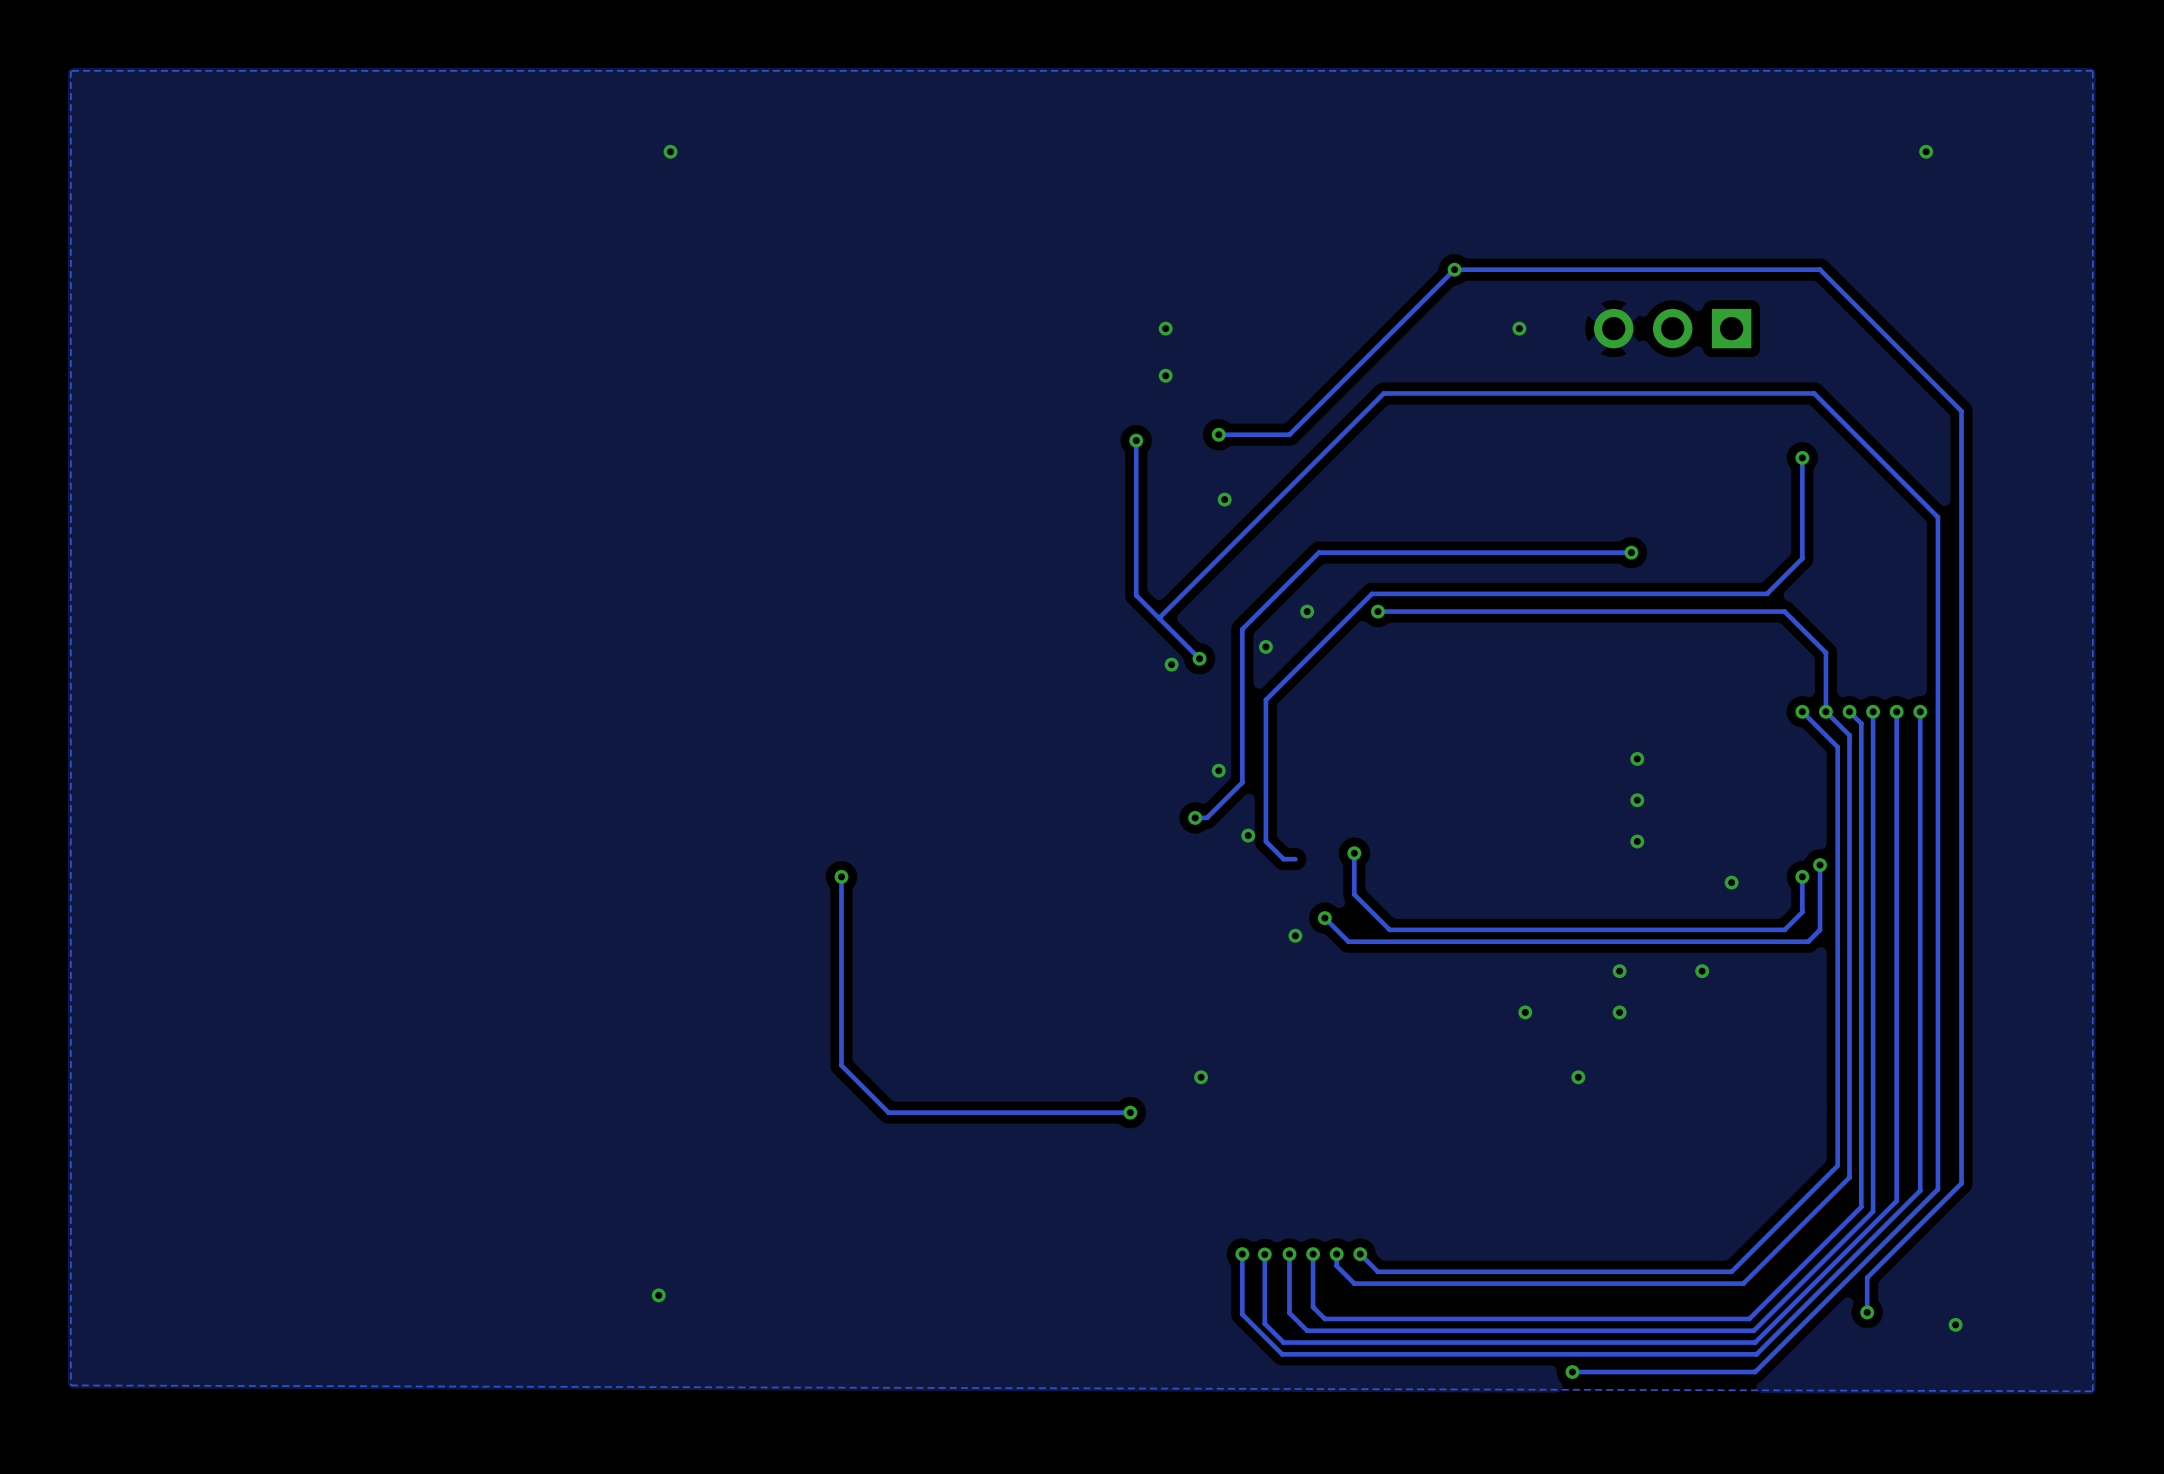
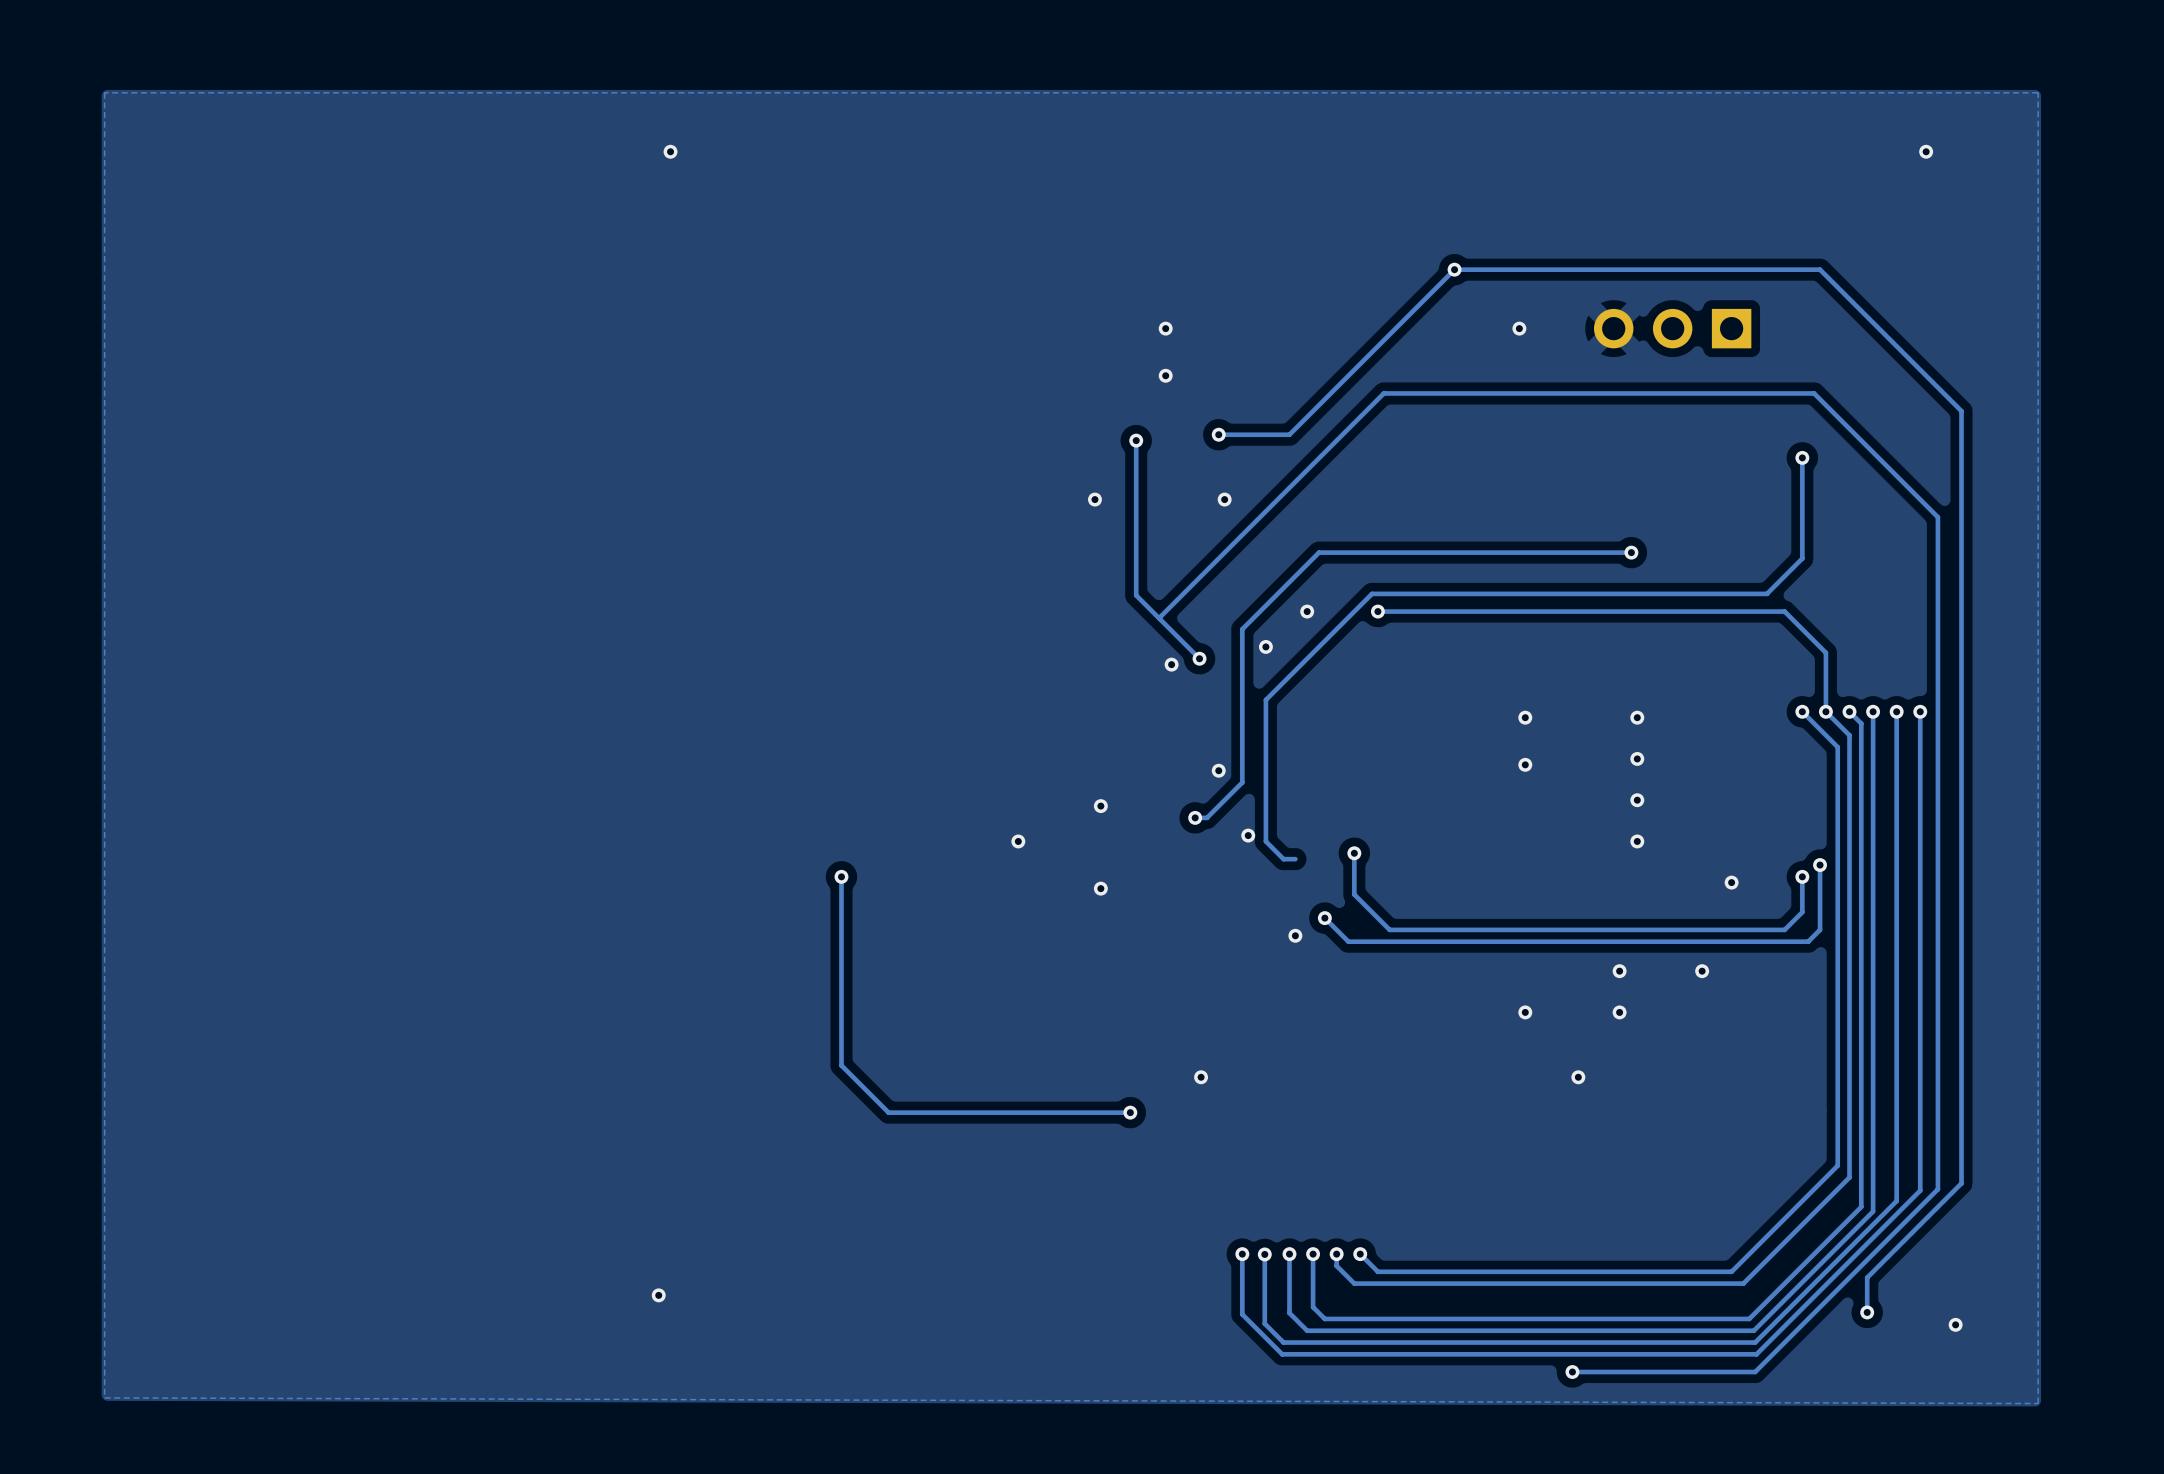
zone outline: (2092, 70) (2092, 1391) (70, 1385) (70, 70) (2092, 70) -> (2038, 92) (2038, 1403) (104, 1397) (104, 92) (2038, 92)
via: none -> (1094, 499)
via: none -> (1525, 717)
via: none -> (1637, 717)
via: none -> (1525, 764)
via: none -> (1100, 806)
via: none -> (1018, 841)
via: none -> (1100, 888)

